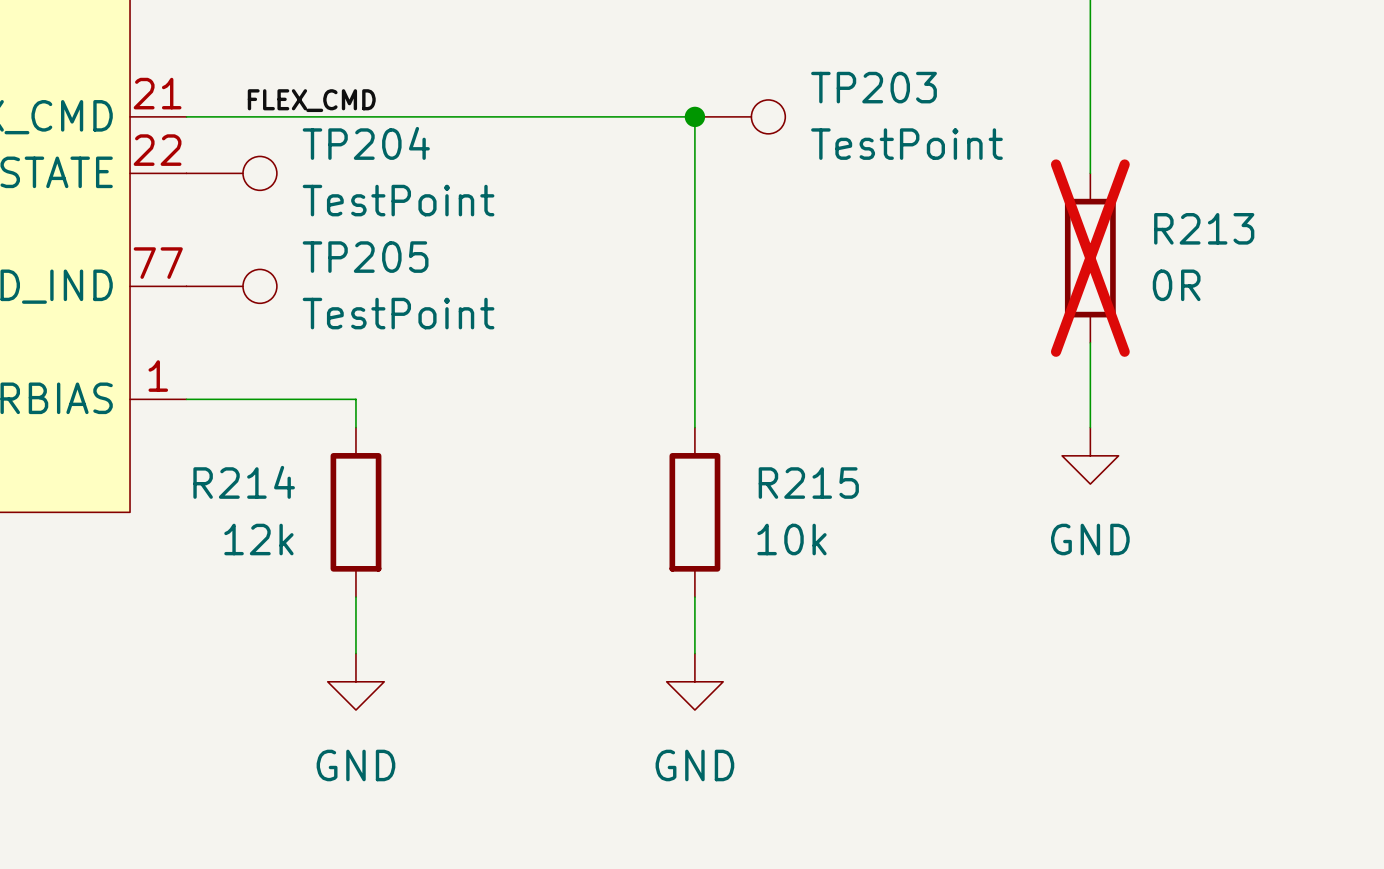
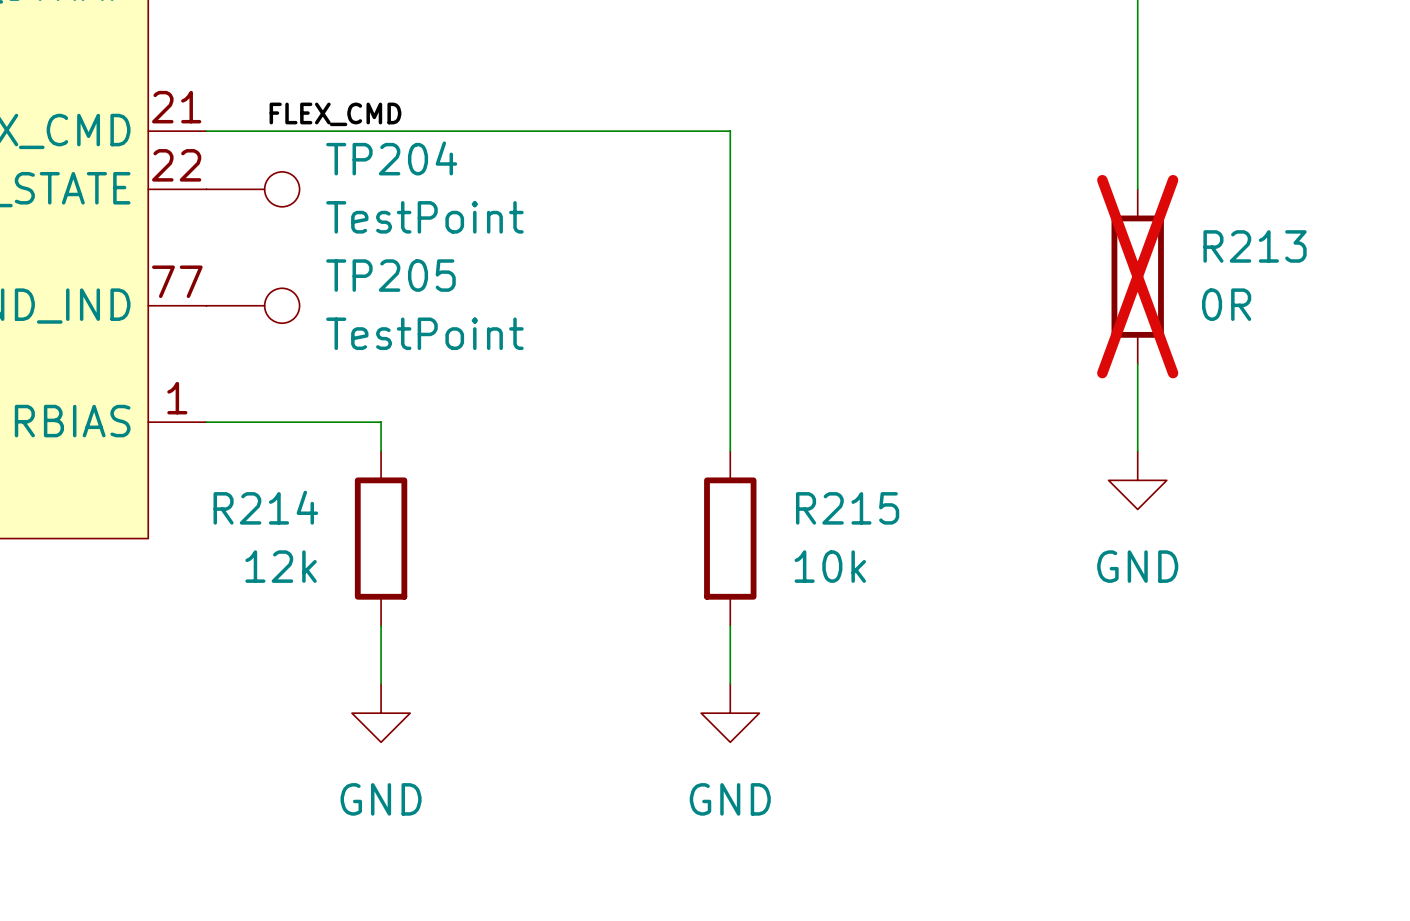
junction: (694, 116) -> none
TP203: TestPoint (740, 116) -> none

